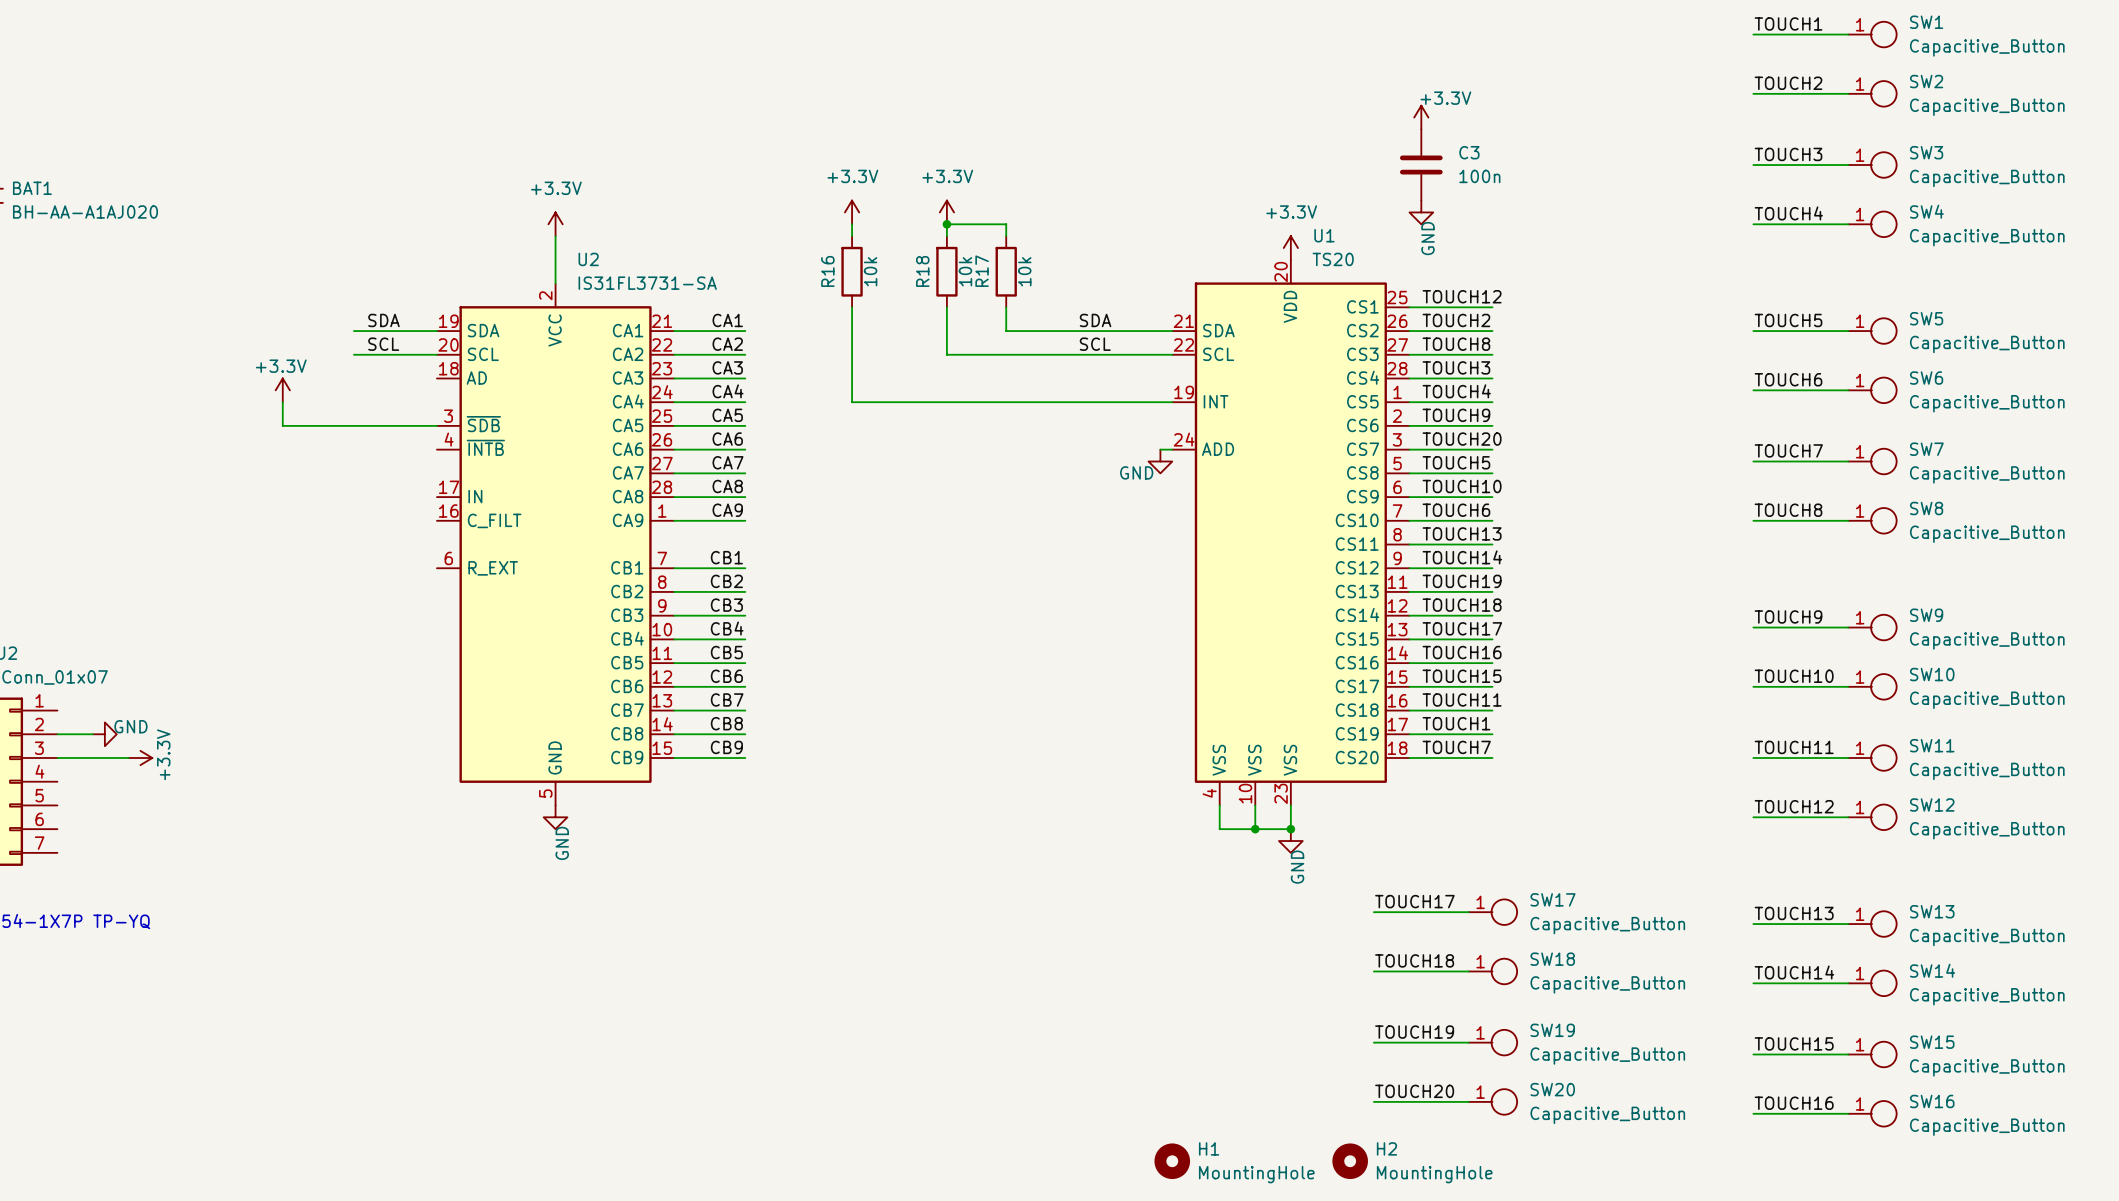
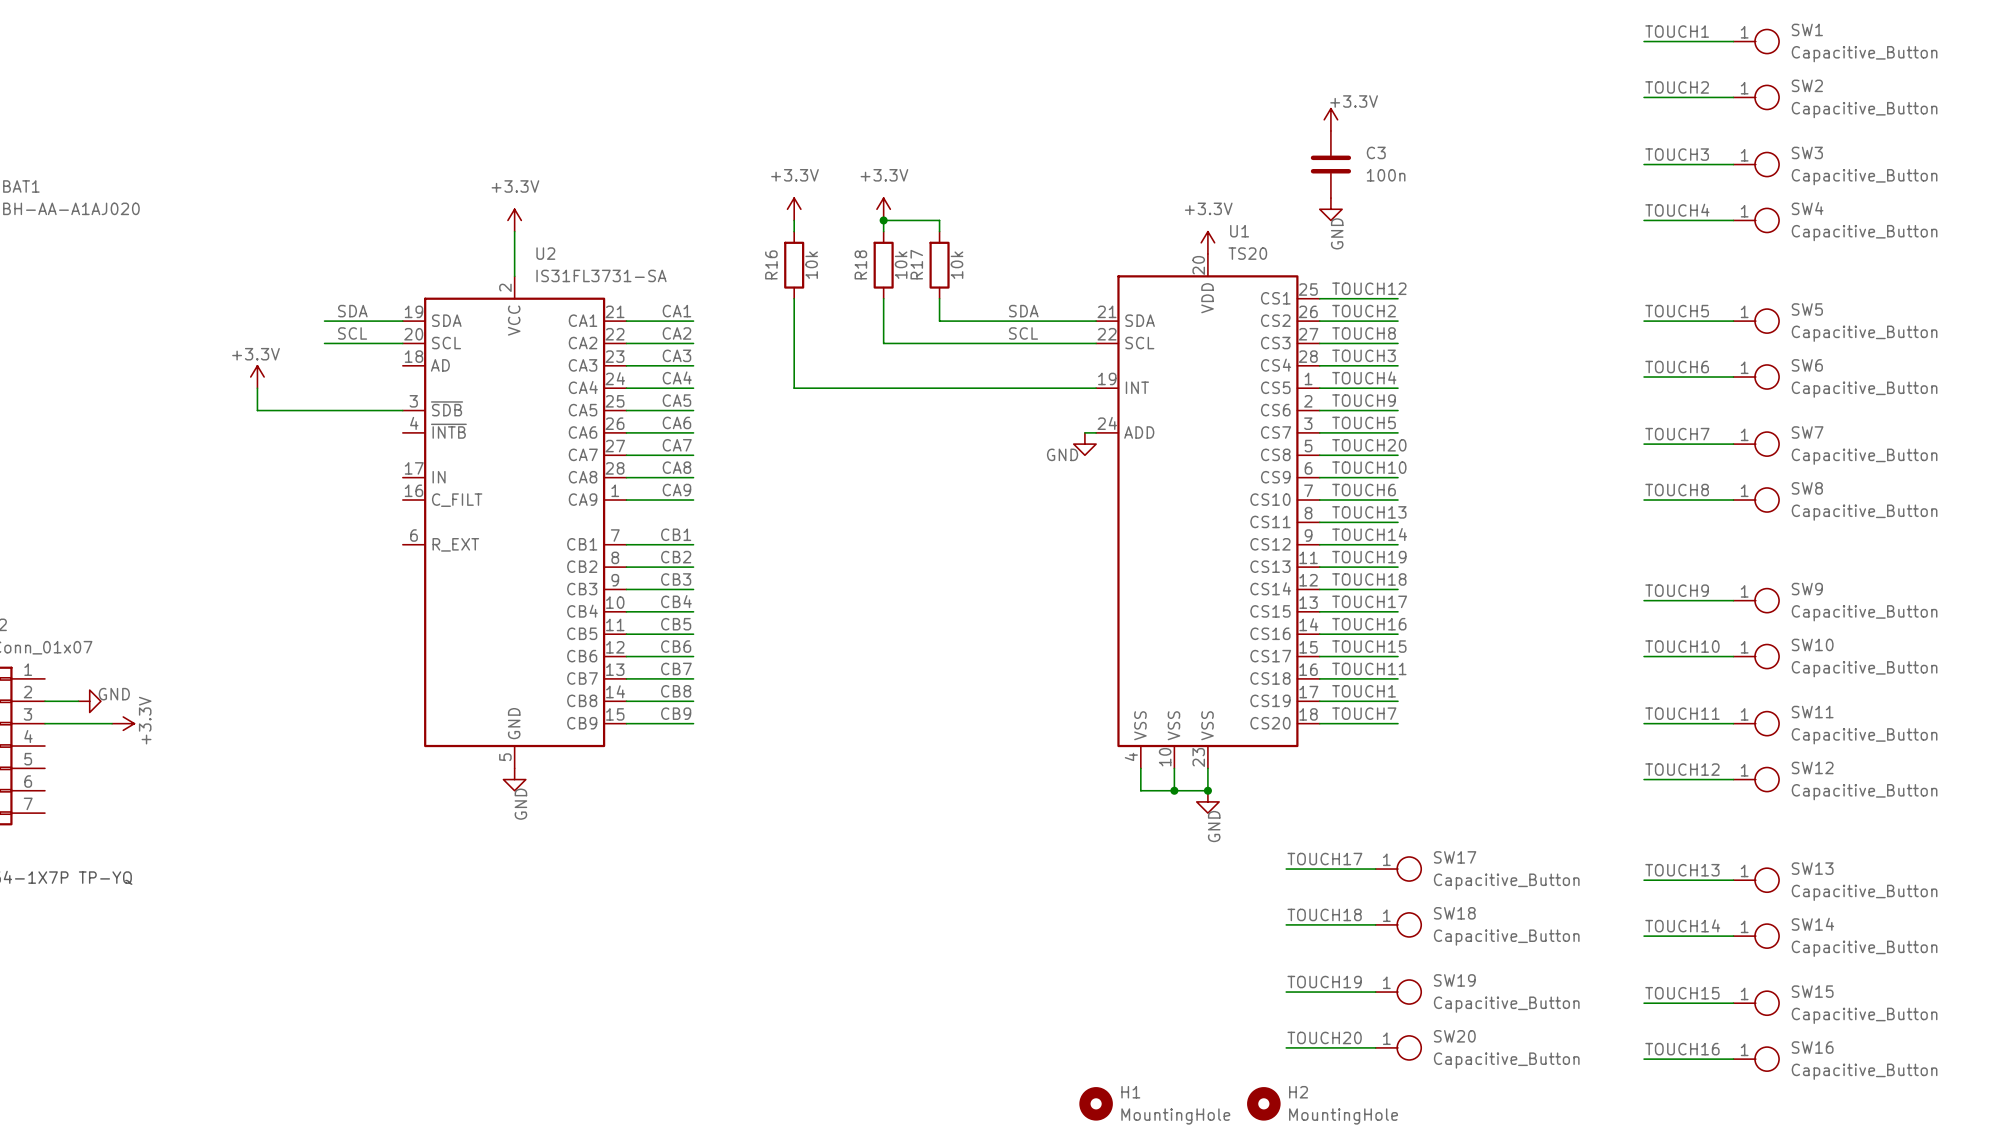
label: TOUCH20 (1462, 439) -> TOUCH5 (1364, 422)
label: TOUCH5 (1456, 462) -> TOUCH20 (1369, 445)

